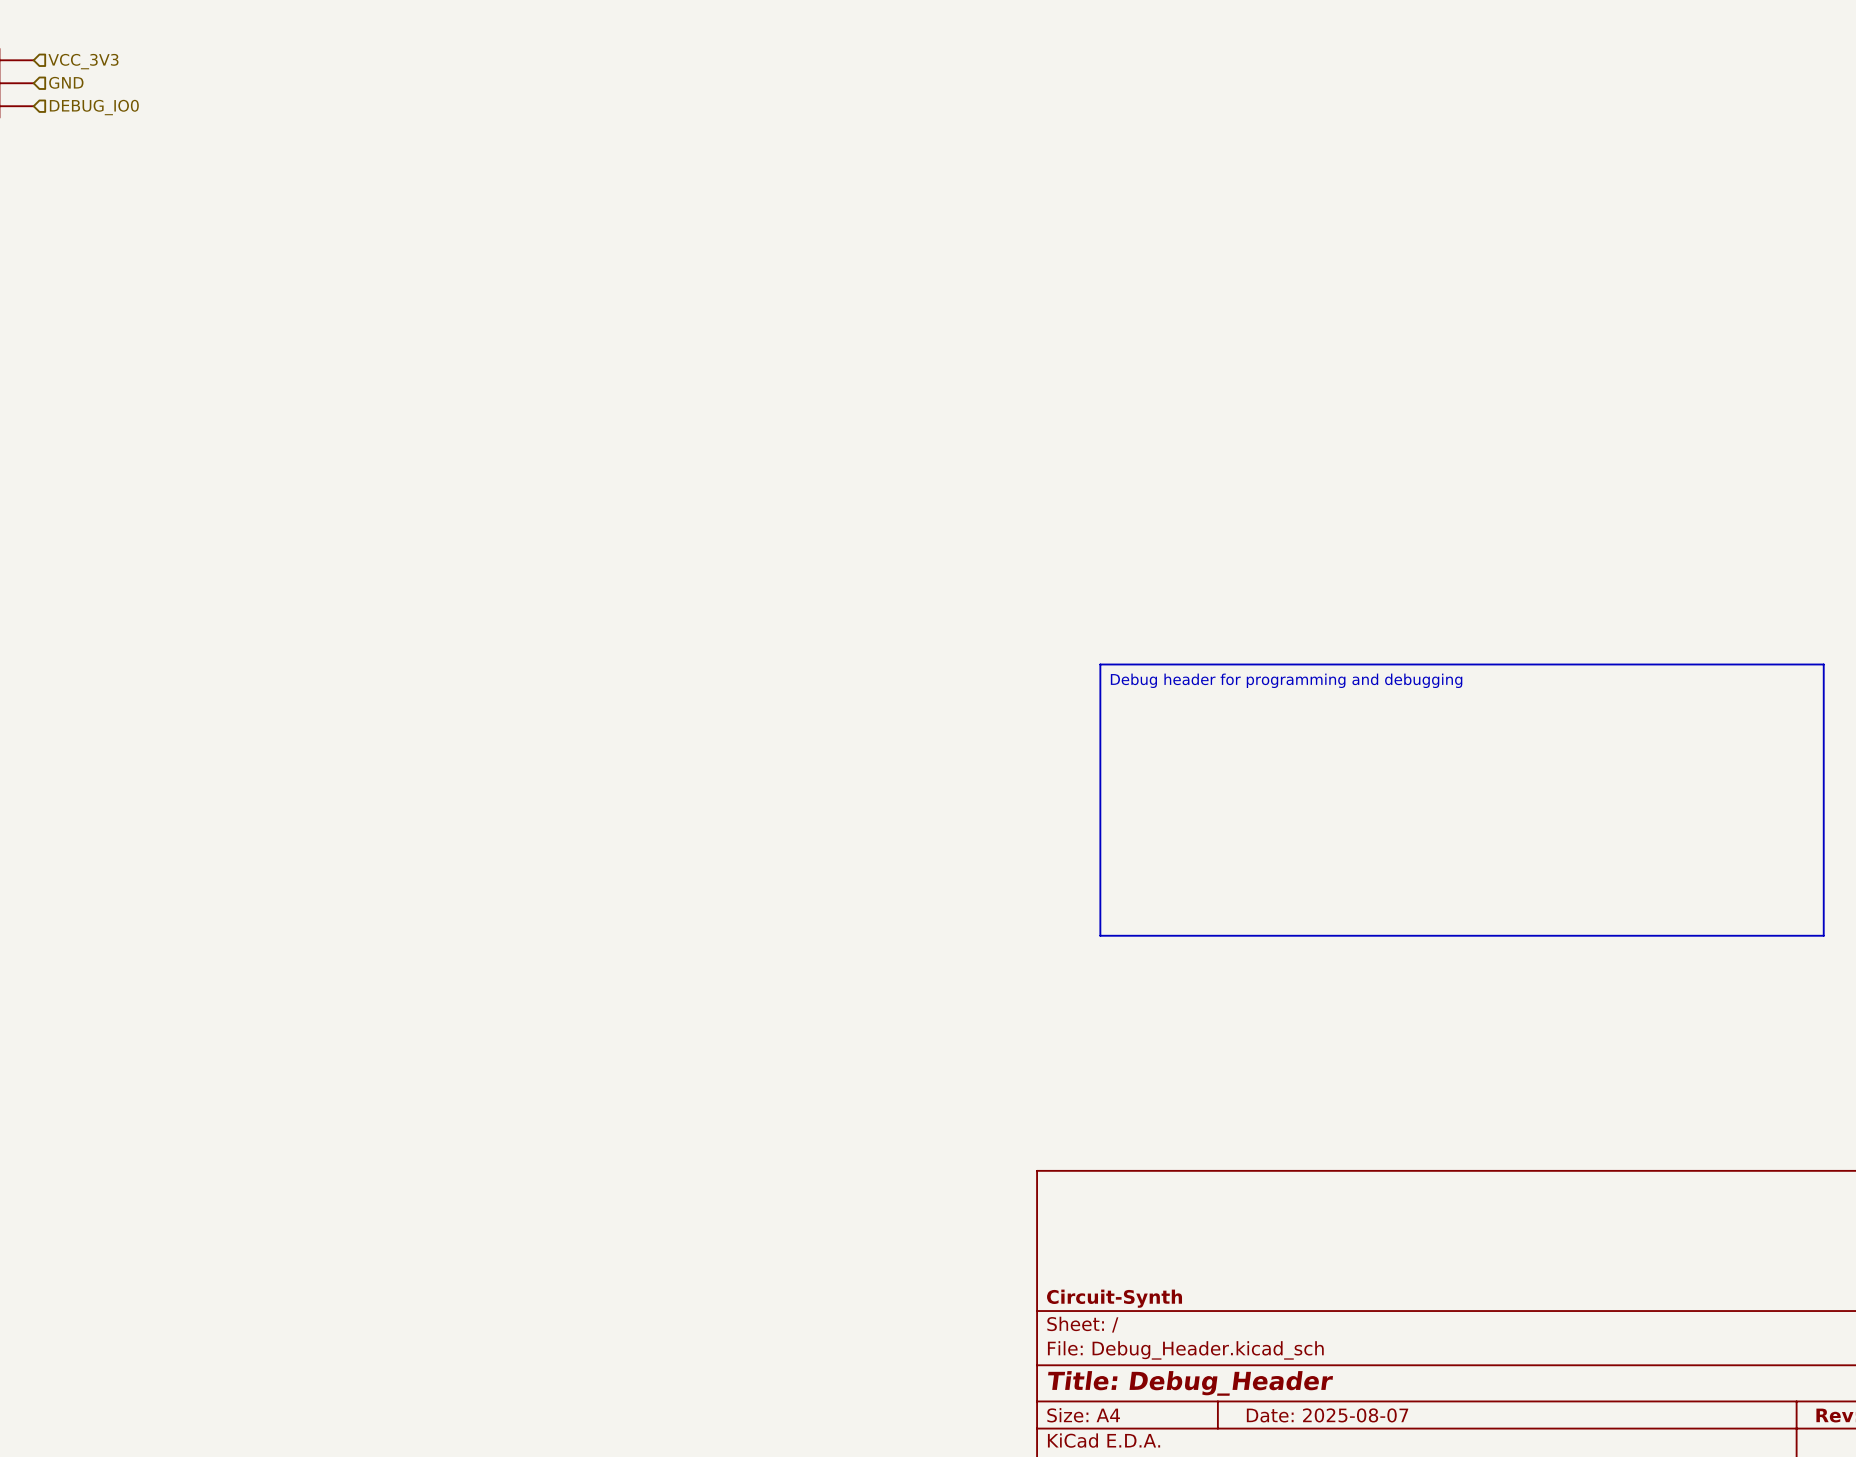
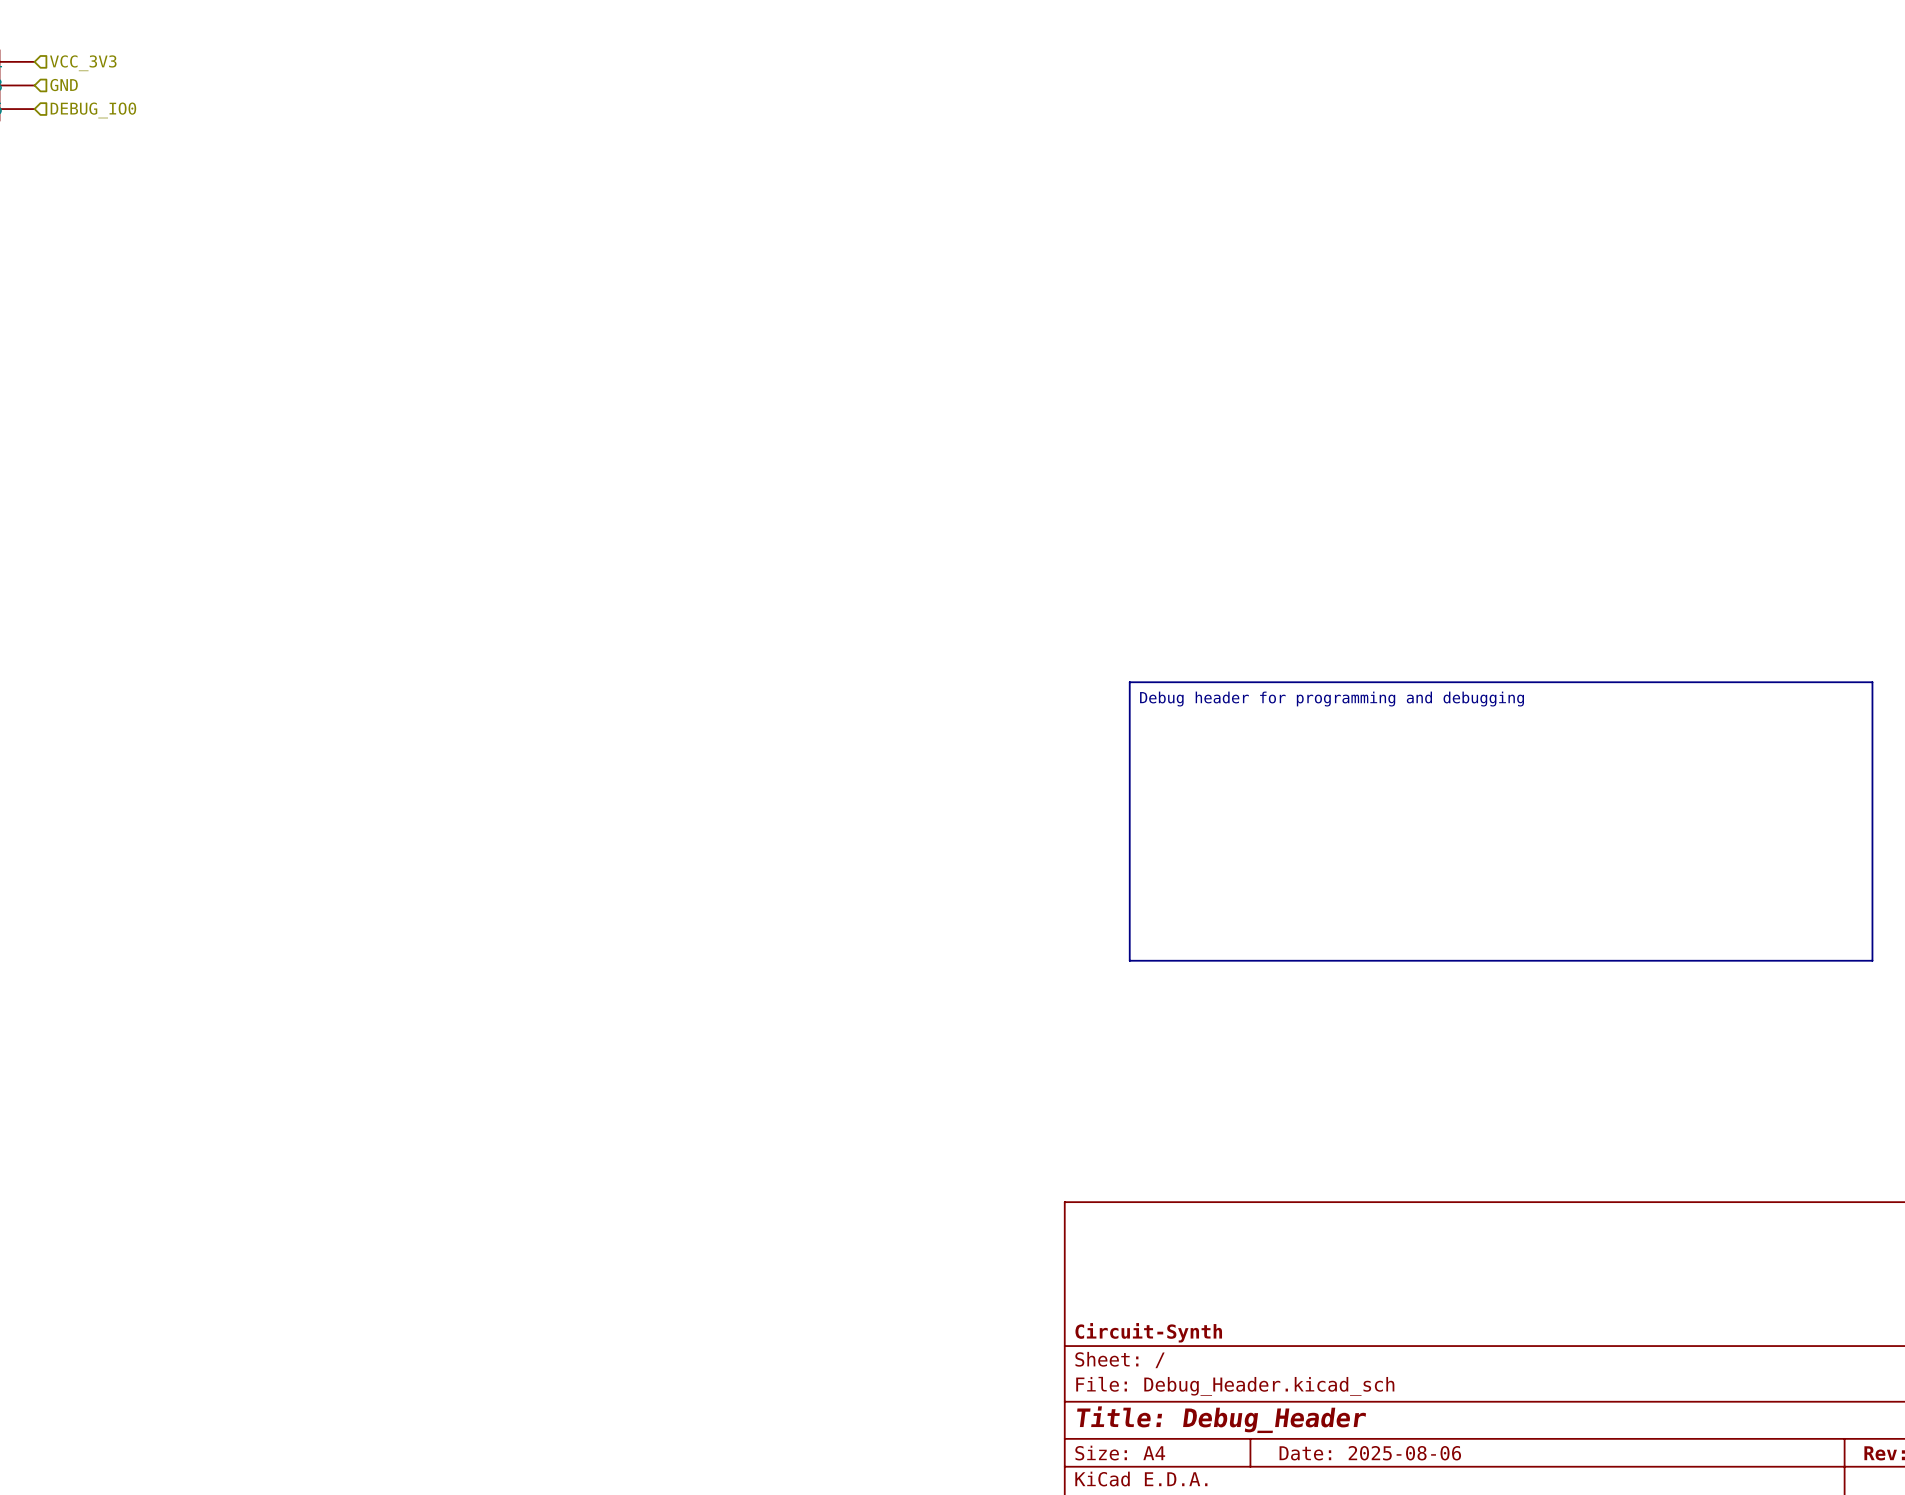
title block: Date: 2025-08-07 (1327, 1415) -> Date: 2025-08-06 (1370, 1453)

